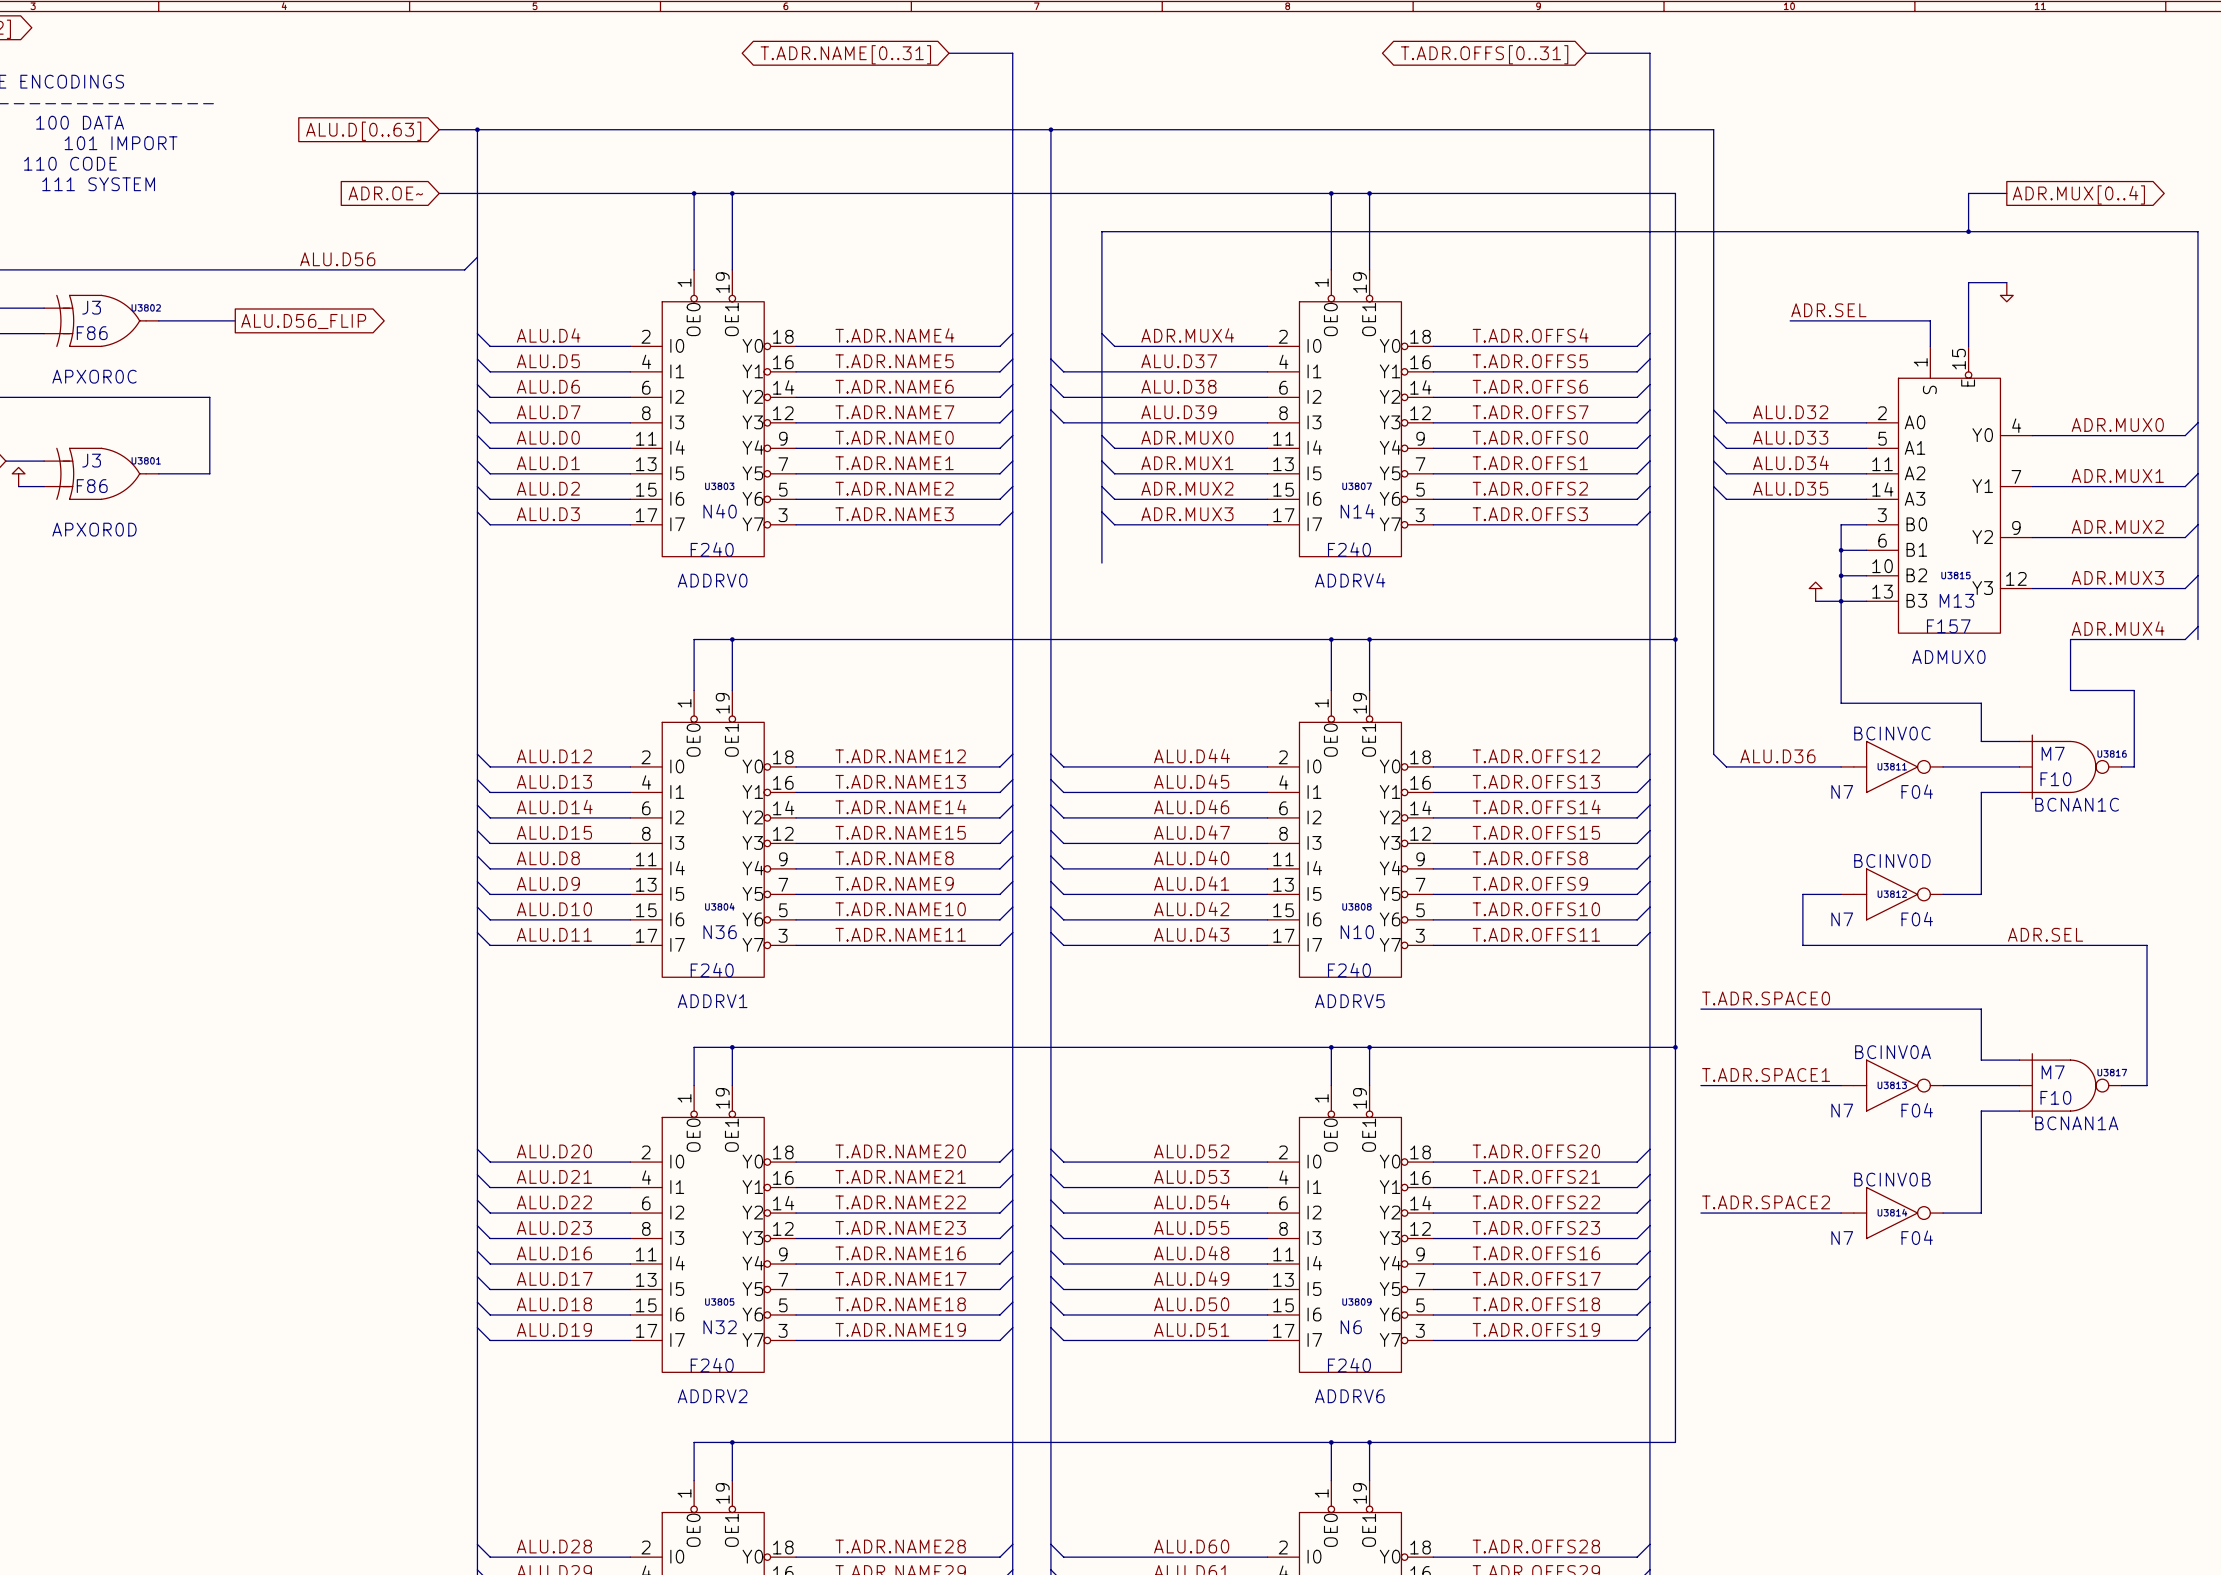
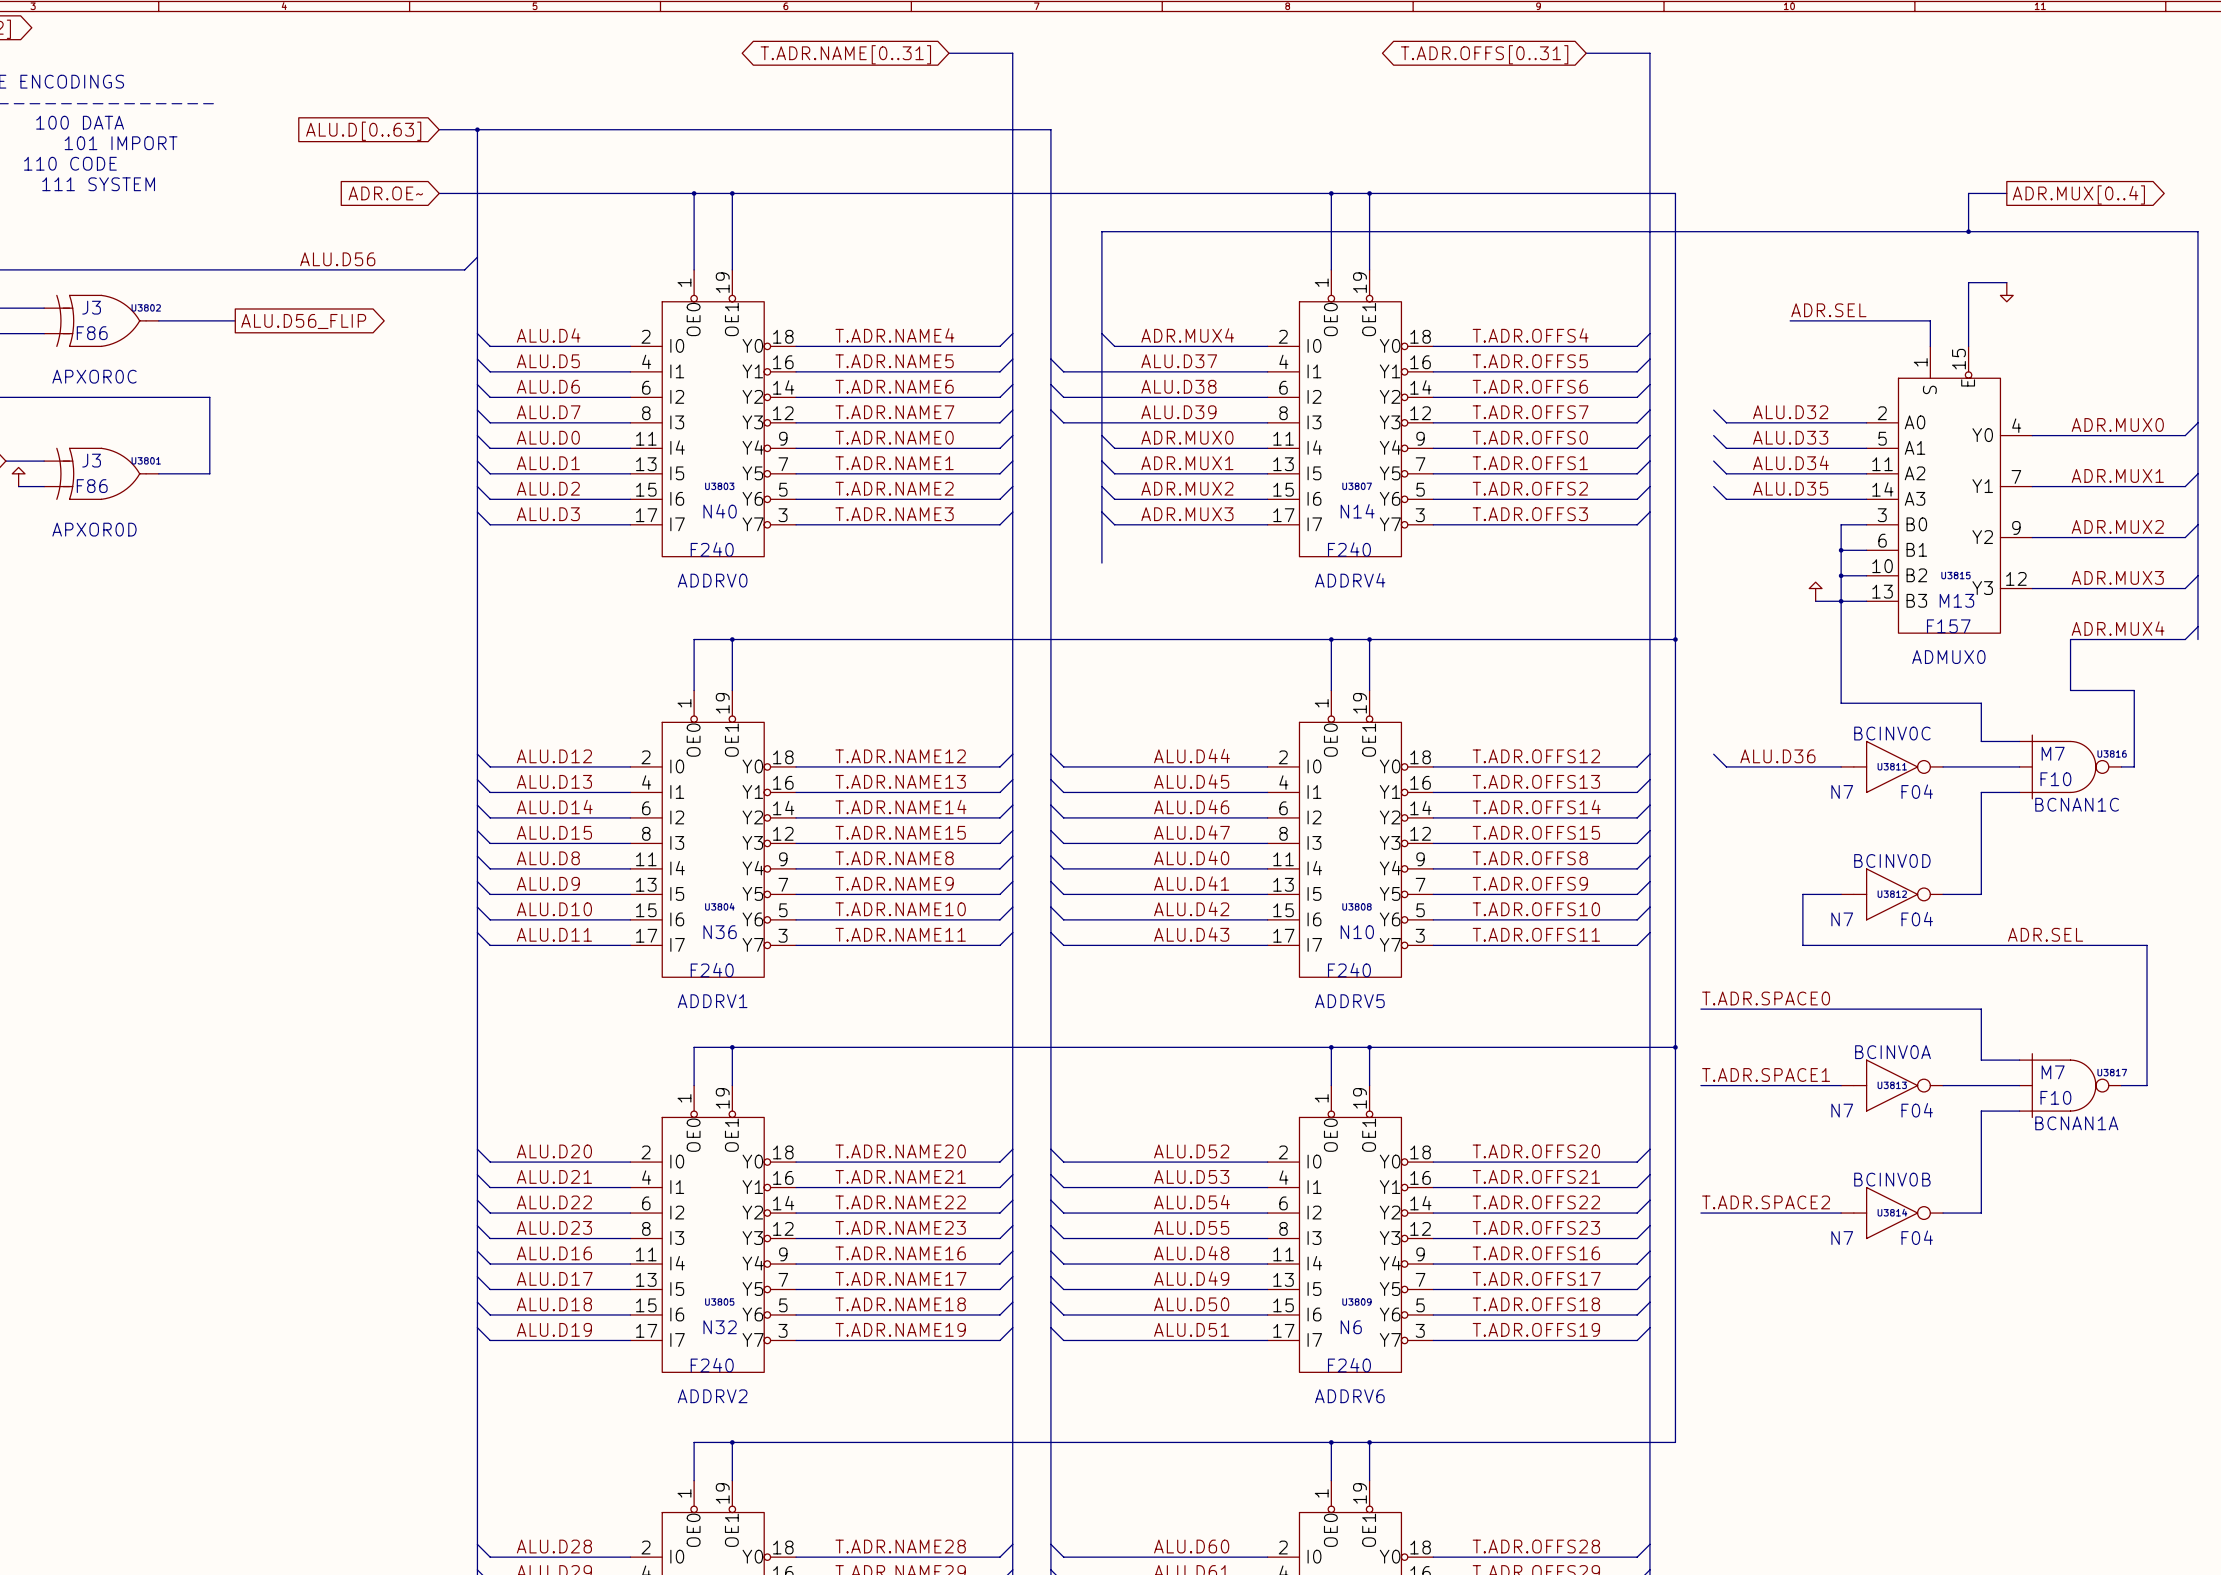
bus: (1050, 129) (1713, 129) (1713, 754) -> none
junction: (1050, 129) -> none

